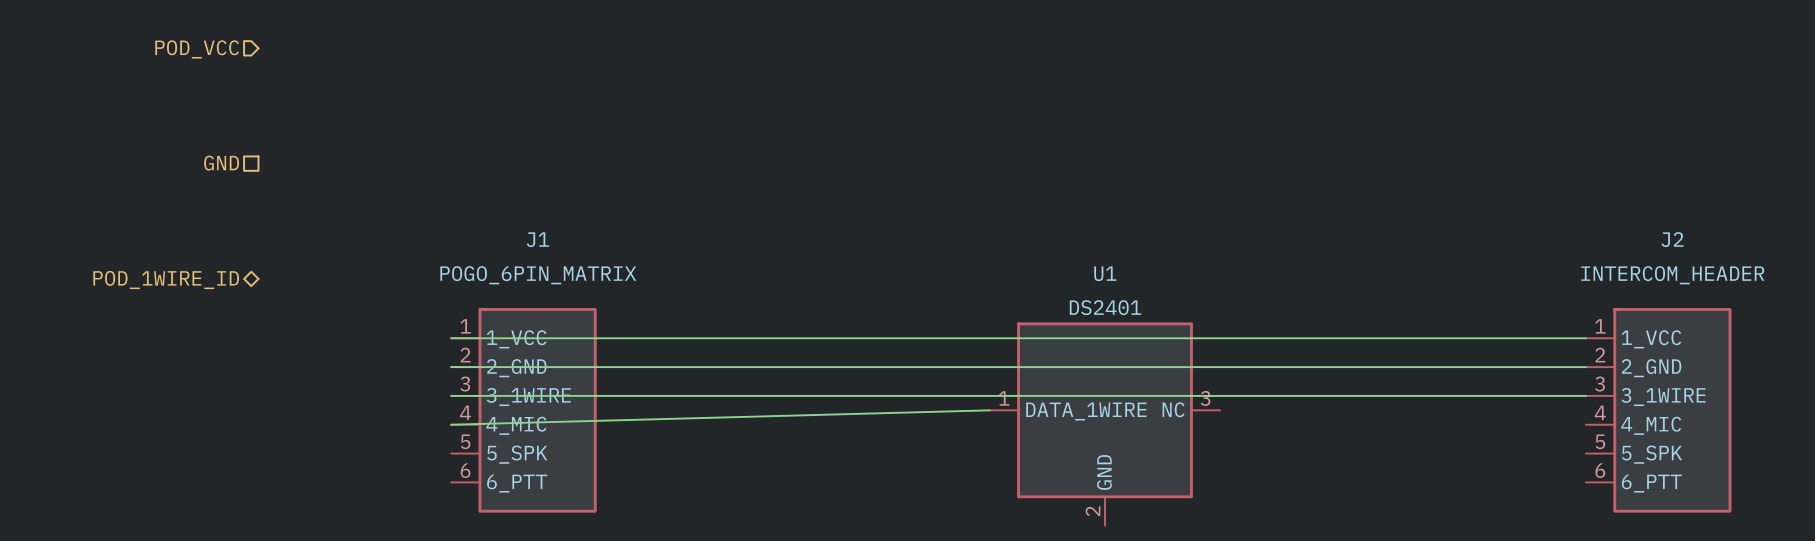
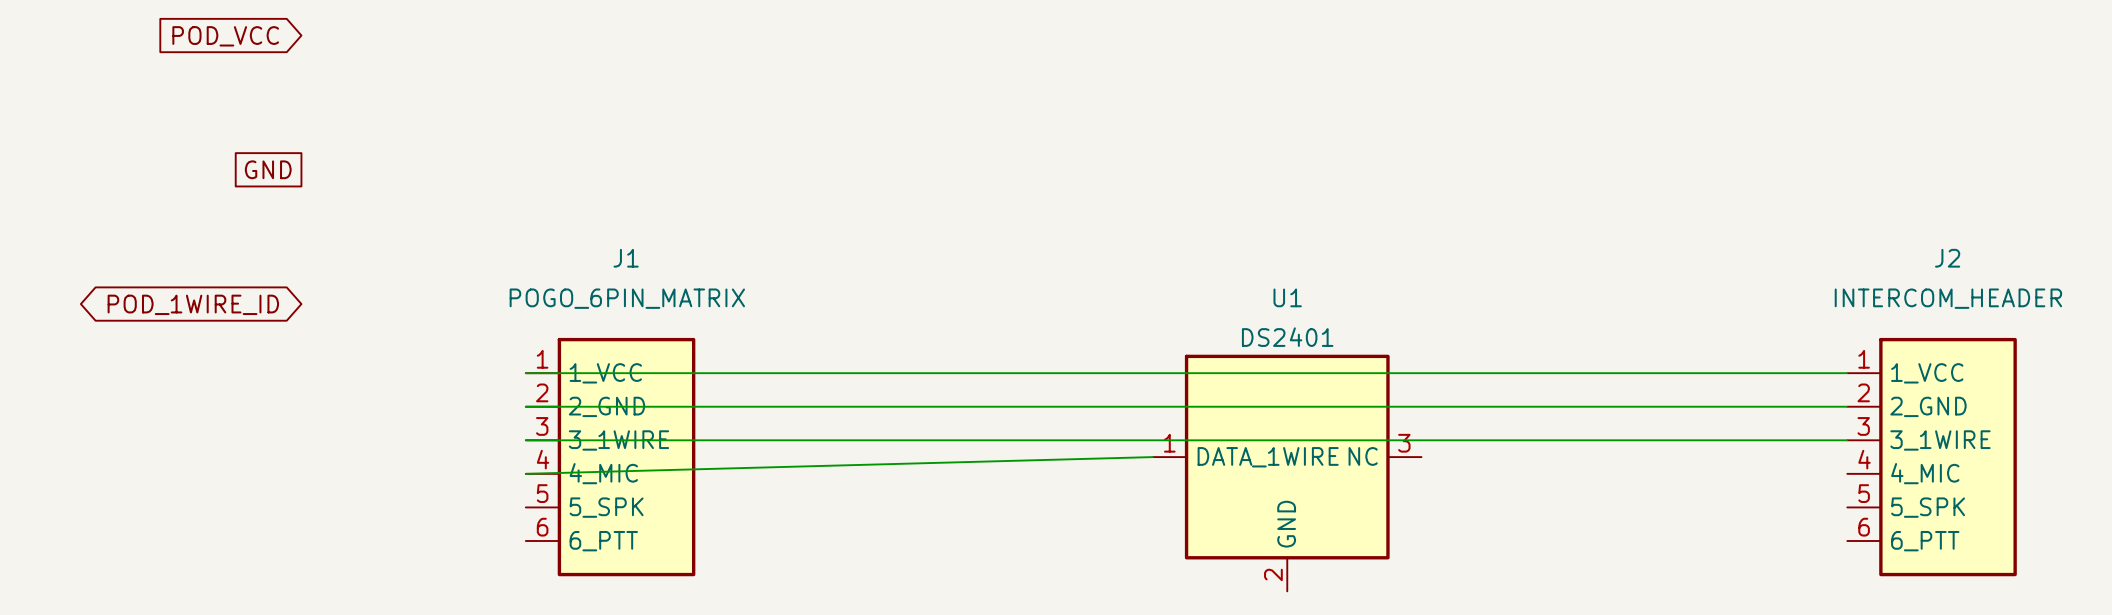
hierarchical label: POD_VCC (197, 49) -> none
global label: none -> POD_VCC (225, 36)
hierarchical label: GND (221, 163) -> none
global label: none -> GND (268, 169)
hierarchical label: POD_1WIRE_ID (166, 280) -> none
global label: none -> POD_1WIRE_ID (193, 304)

